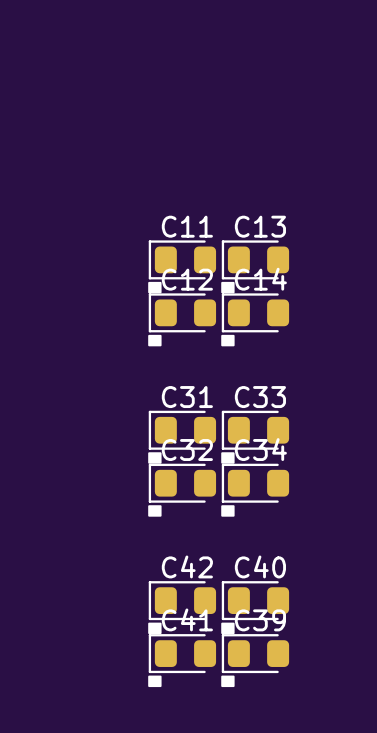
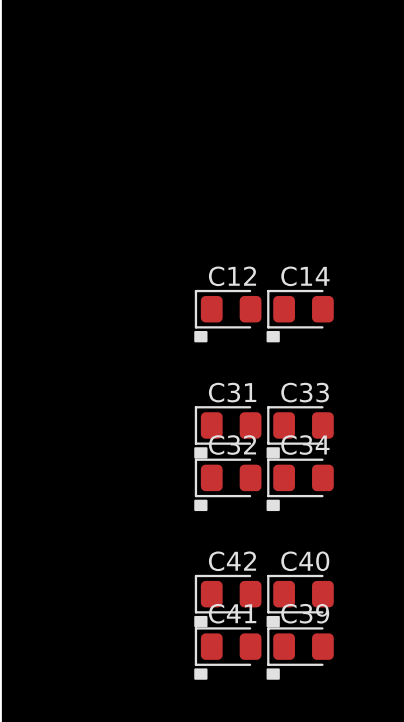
C11: (182, 266) -> none
C13: (255, 266) -> none

